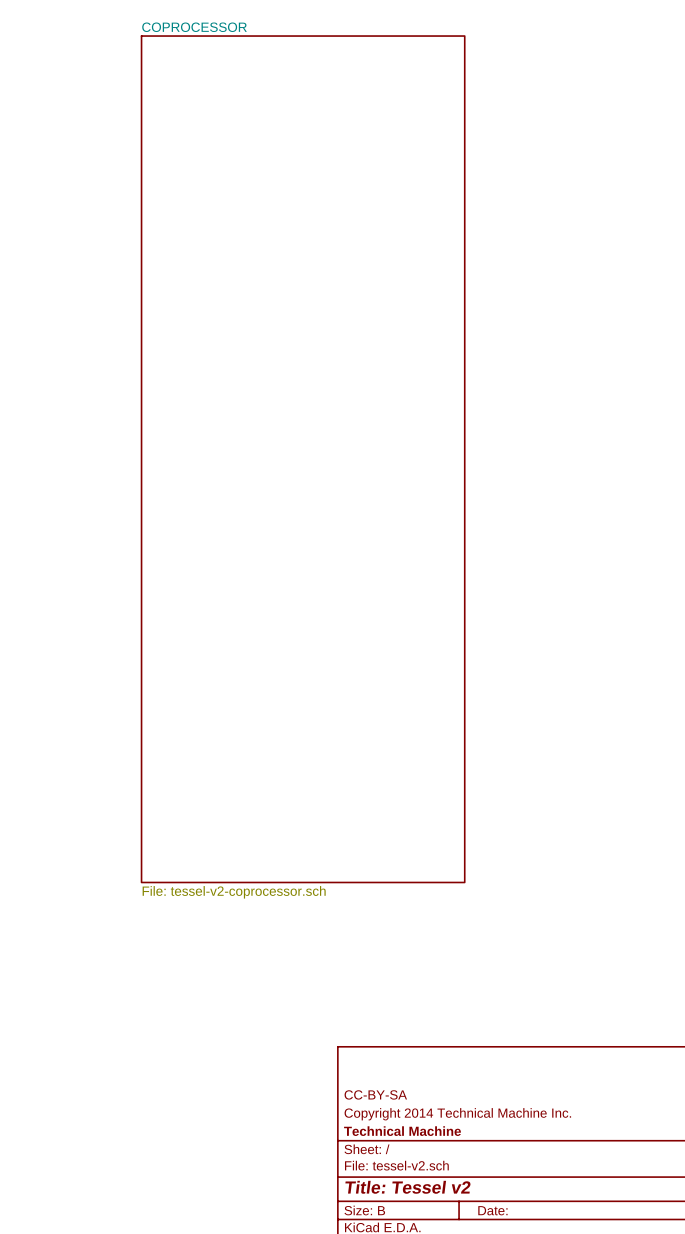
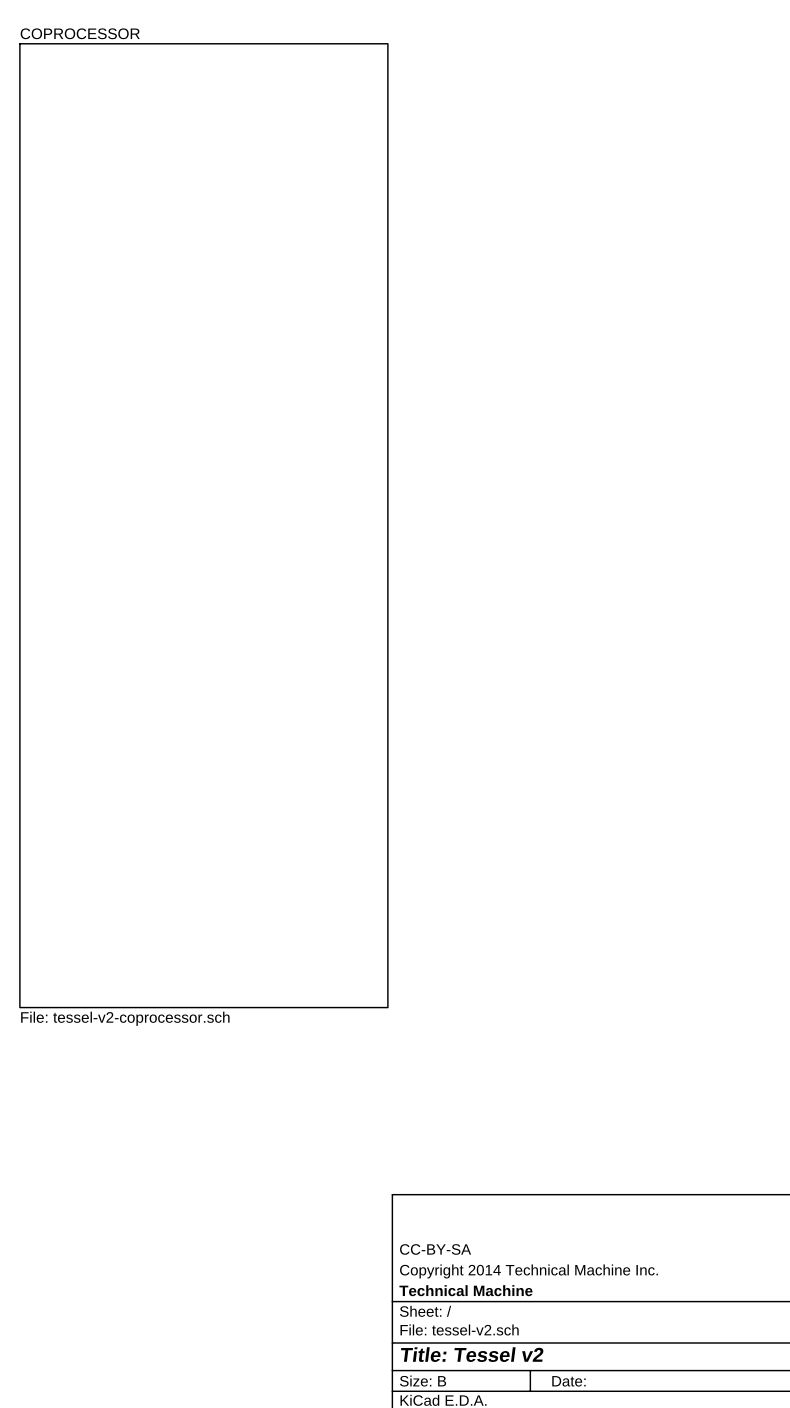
sheet COPROCESSOR position: (303, 459) -> (203, 525)

